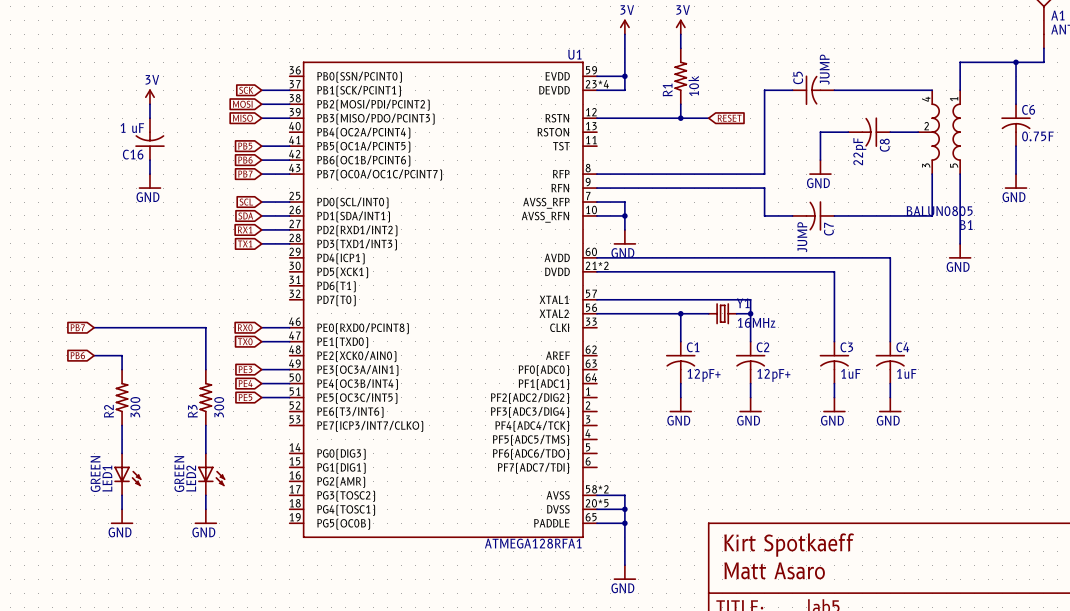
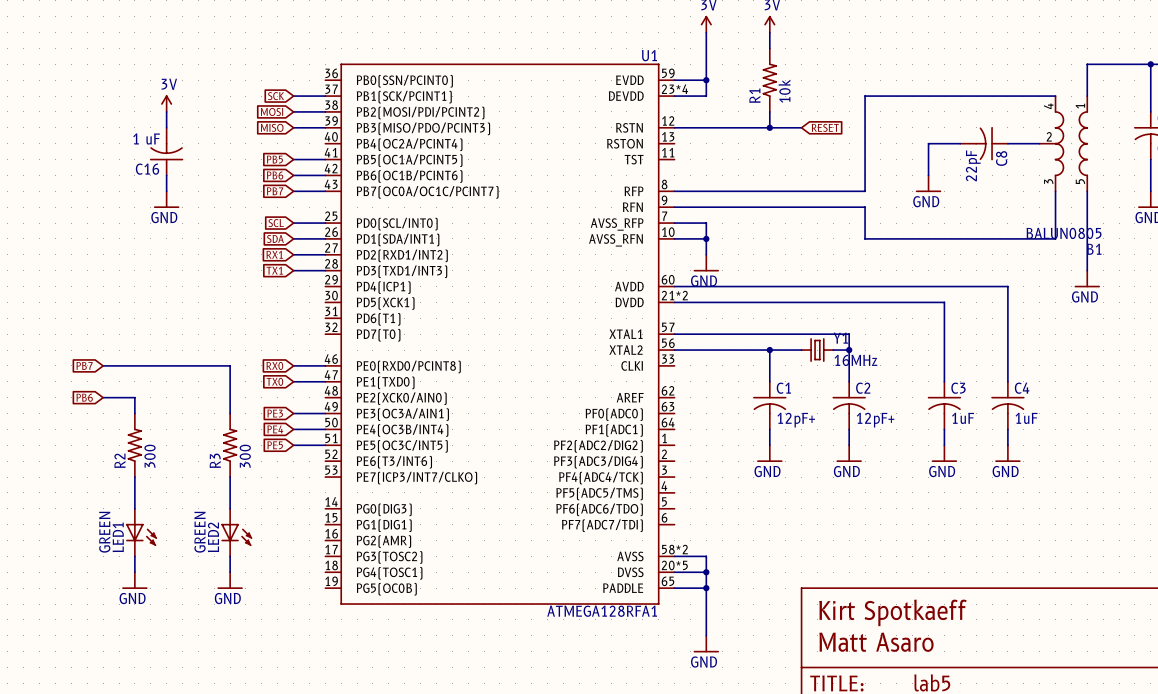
C5: JUMP (813, 90) -> none
C7: JUMP (813, 215) -> none

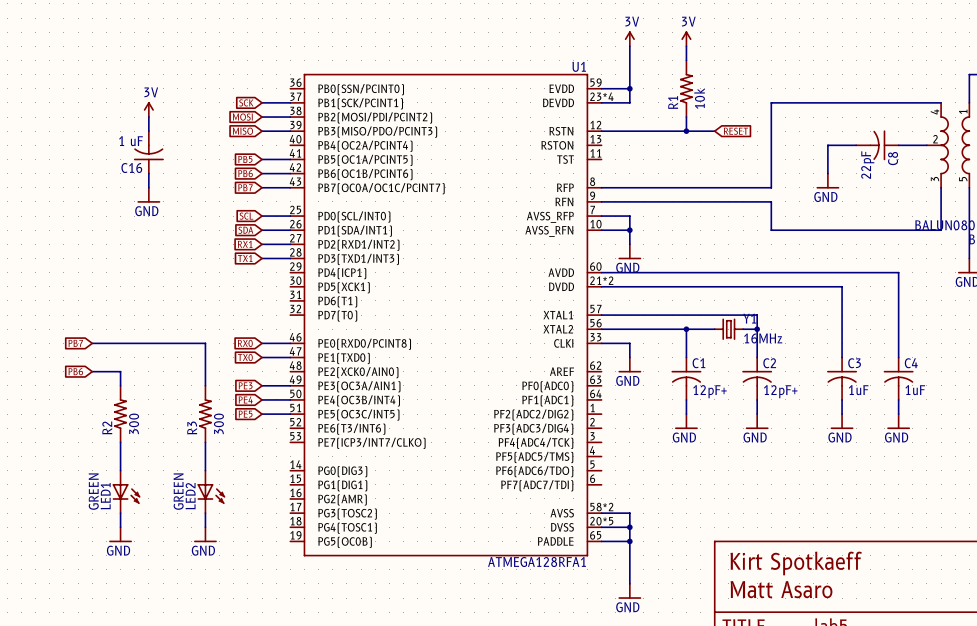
wire: none -> (601, 343) (629, 343) (629, 357)
power symbol: none -> GND (629, 364)

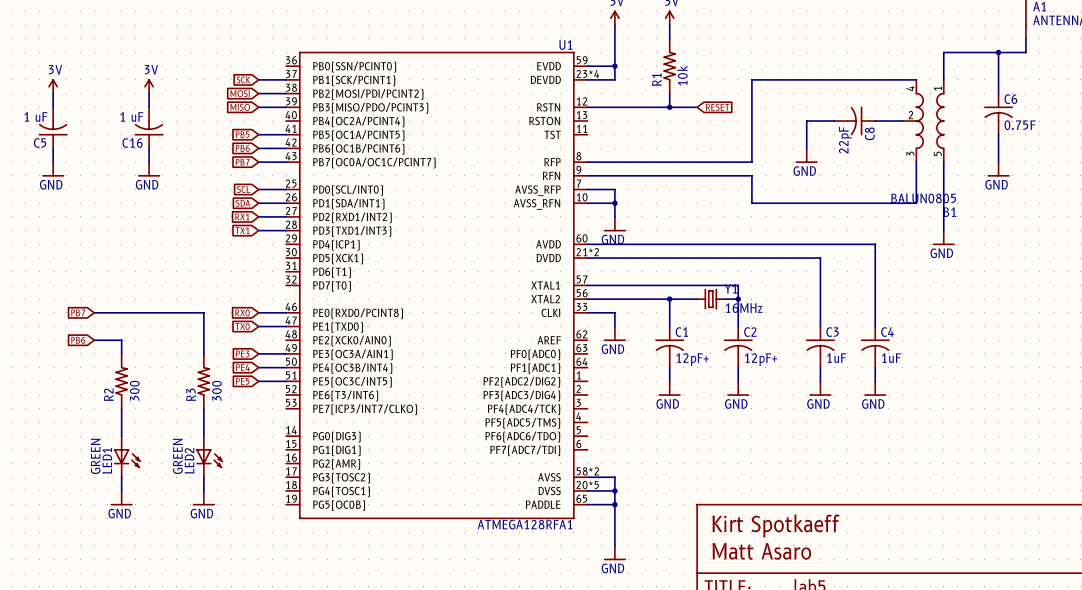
power symbol: none -> 3V (53, 86)
wire: none -> (53, 93) (53, 107)
C5: none -> 1 uF (53, 127)
wire: none -> (53, 148) (53, 162)
power symbol: none -> GND (53, 169)

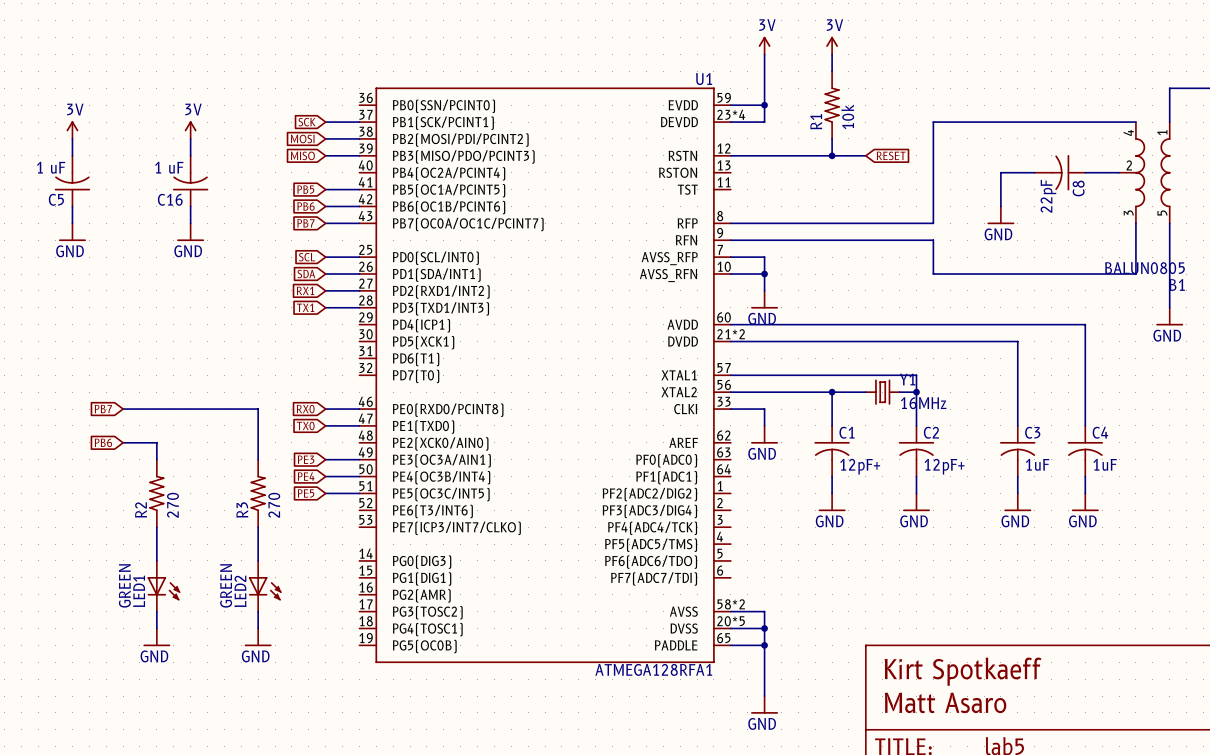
R2 value: 300 (134, 390) -> 270 (172, 505)
R3 value: 300 (216, 390) -> 270 (274, 505)

